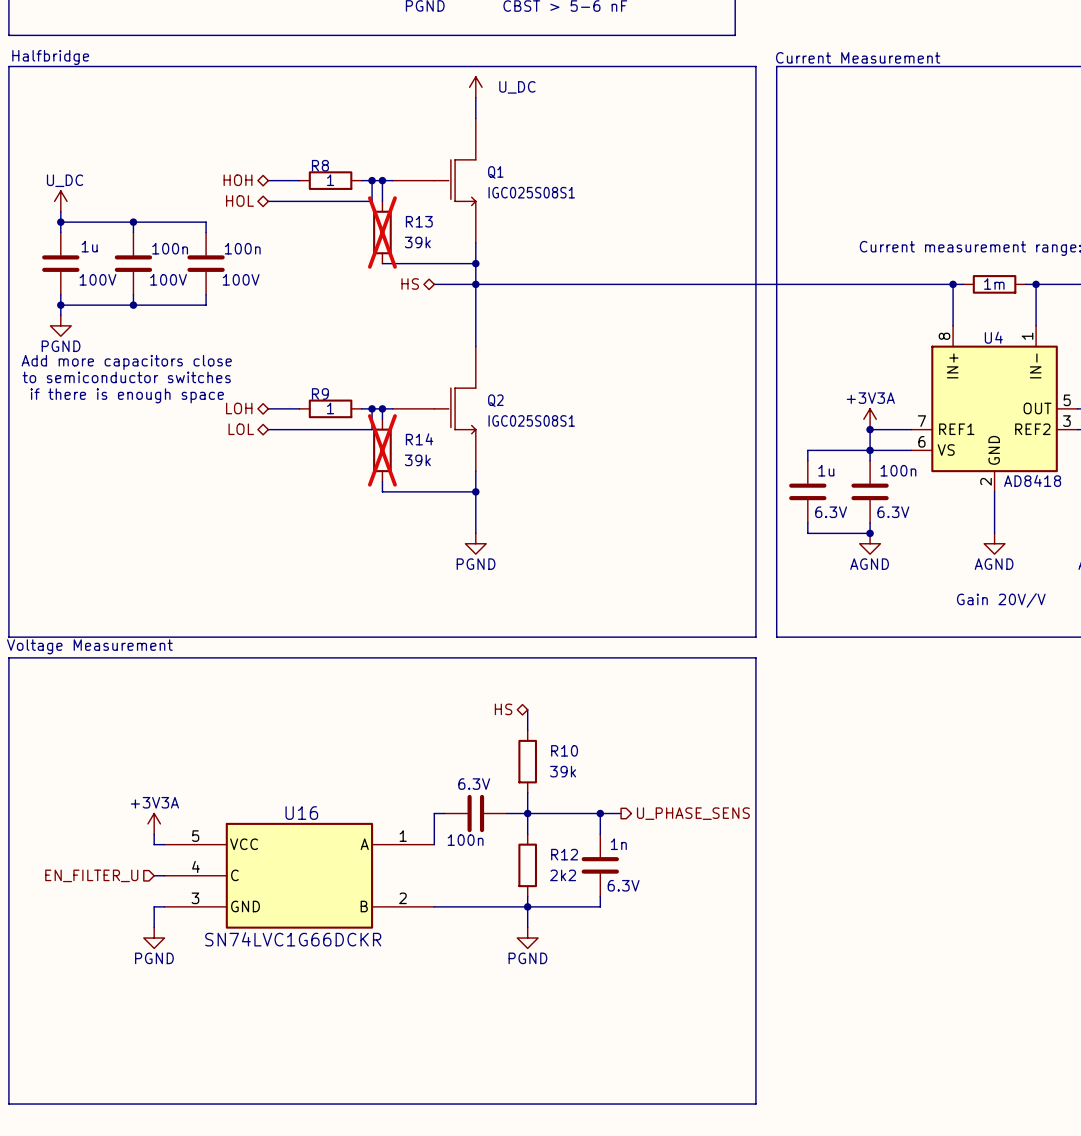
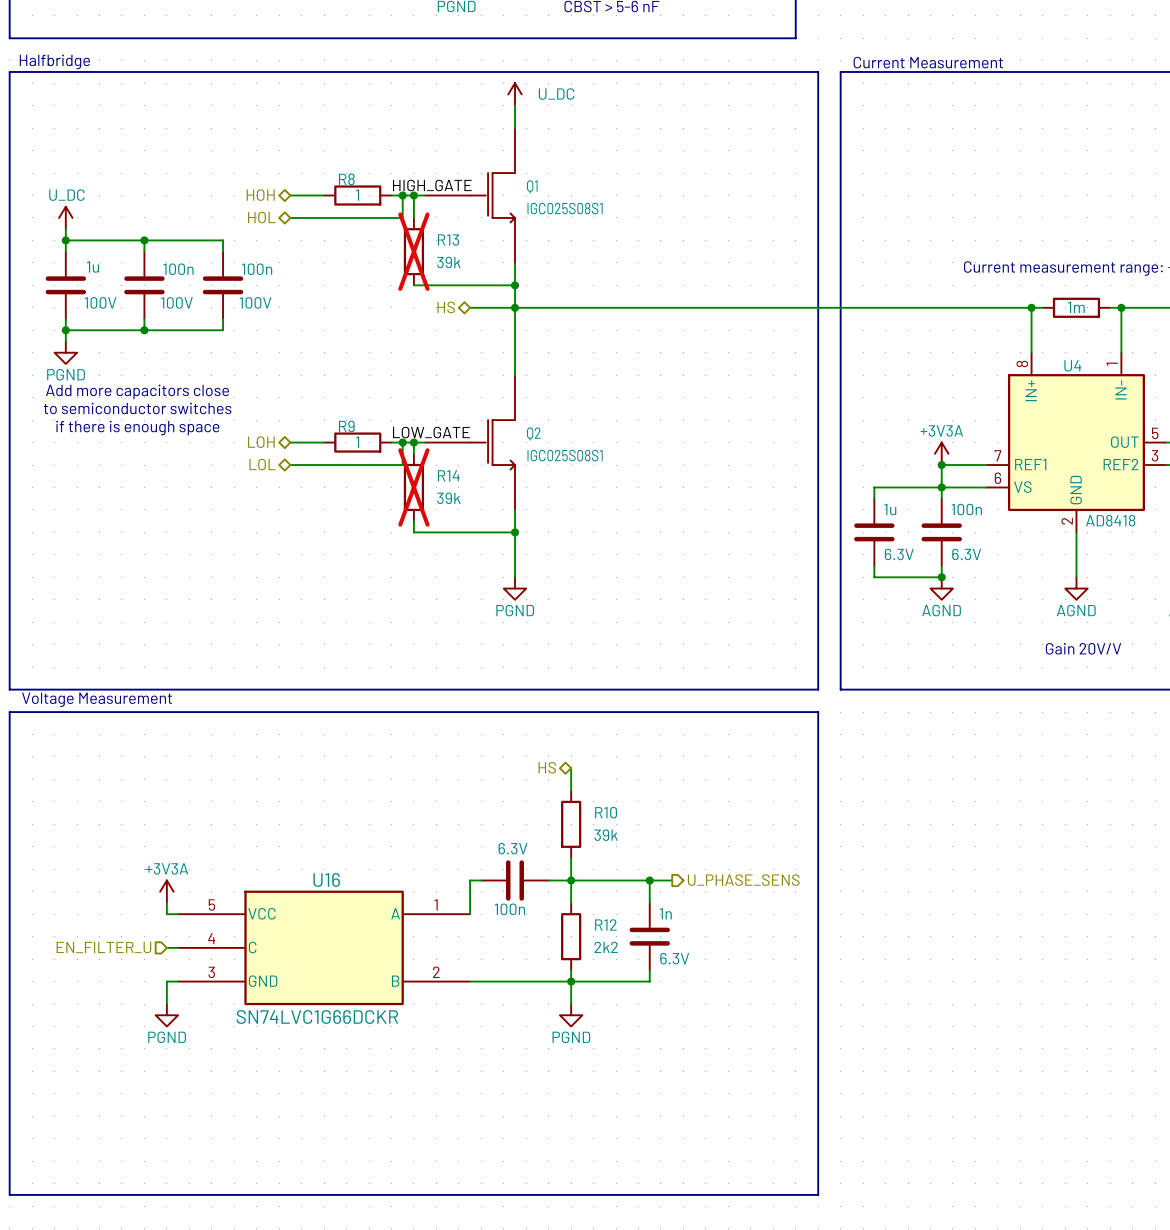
label: none -> HIGH_GATE (432, 185)
label: none -> LOW_GATE (431, 432)

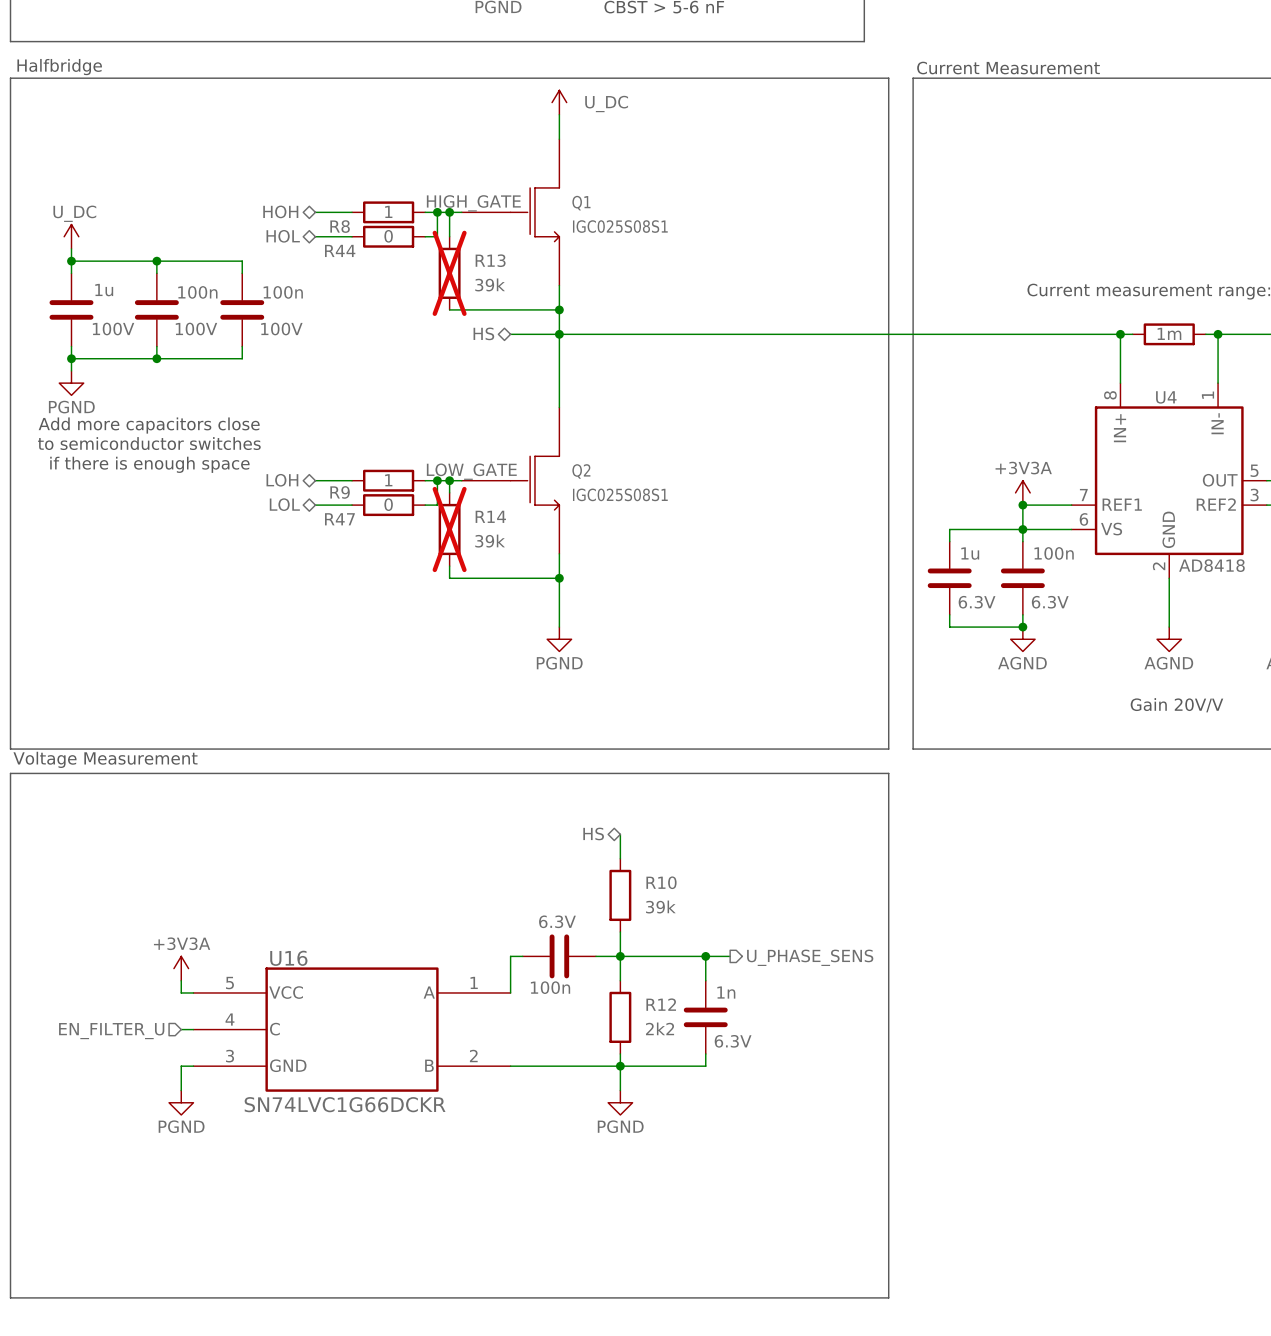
R8 name position: R8 (346, 179) -> R8 (340, 226)
wire: (324, 217) (391, 217) -> none
R44: none -> 0 (388, 236)
R9 name position: R9 (346, 426) -> R9 (340, 492)
wire: (324, 465) (391, 465) -> none
R47: none -> 0 (388, 505)
U16 name position: U16 (326, 880) -> U16 (288, 958)

